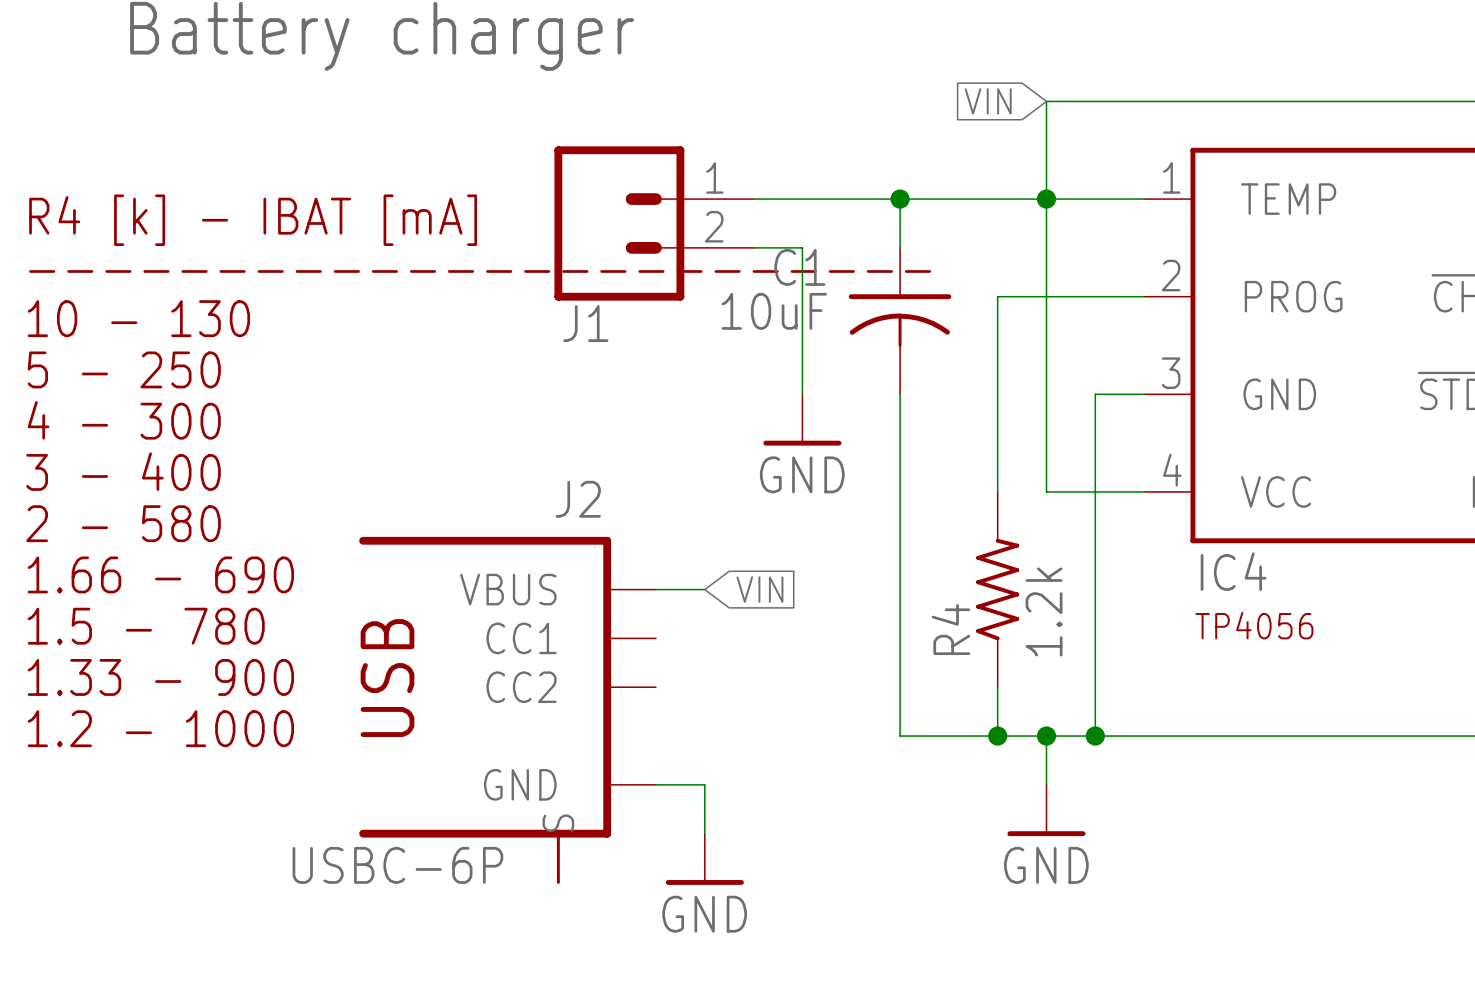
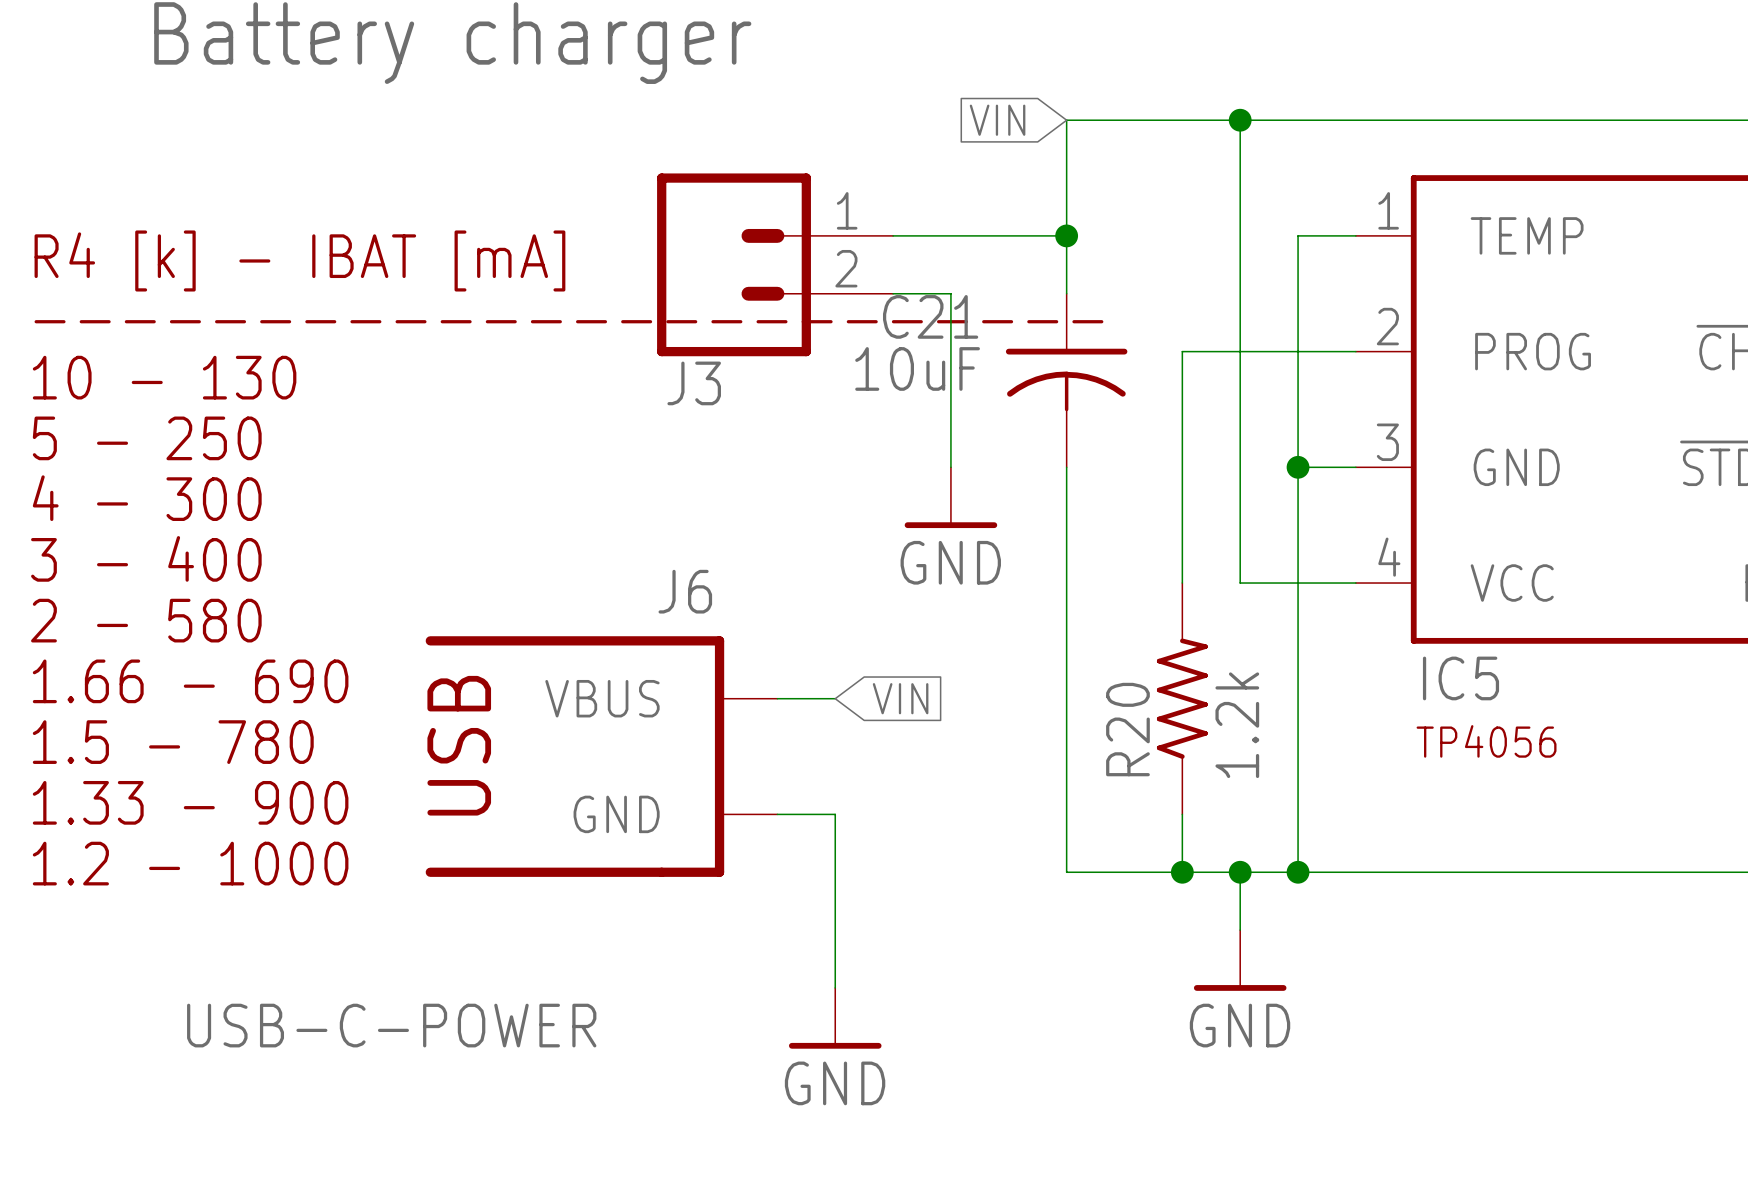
global label position: VIN (988, 101) -> VIN (997, 120)
wire: (900, 199) (1095, 199) -> (1066, 235) (1066, 120) (1240, 120)
junction position: (1046, 199) -> (1240, 120)
wire: none -> (1298, 235) (1298, 467)
C1 name: C1 (799, 267) -> C21 (930, 316)
J1 name: J1 (585, 323) -> J3 (694, 383)
junction: none -> (1298, 467)
IC4 name: IC4 (1233, 571) -> IC5 (1460, 678)
R4 name: R4 (950, 629) -> R20 (1127, 729)
J6: none -> USB-C-POWER (601, 756)
J2: USBC-6P (507, 710) -> none
wire: (655, 784) (704, 784) -> (777, 814) (835, 814) (835, 930)

